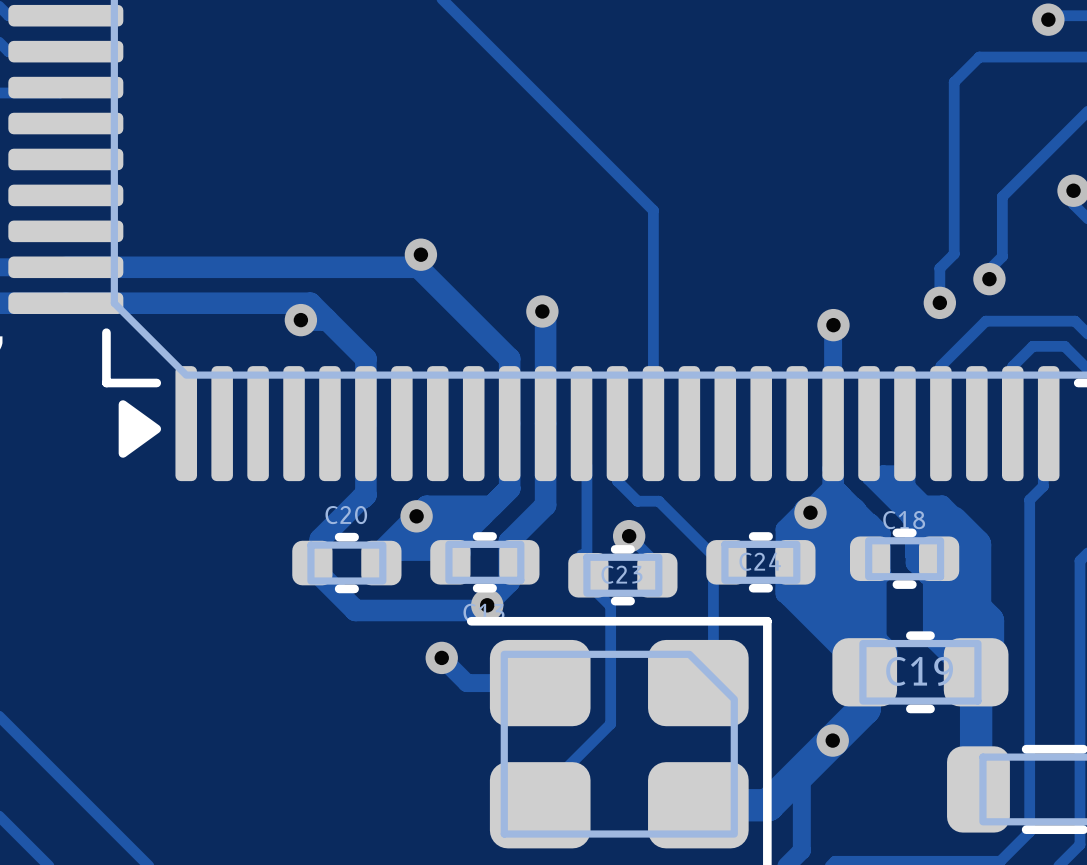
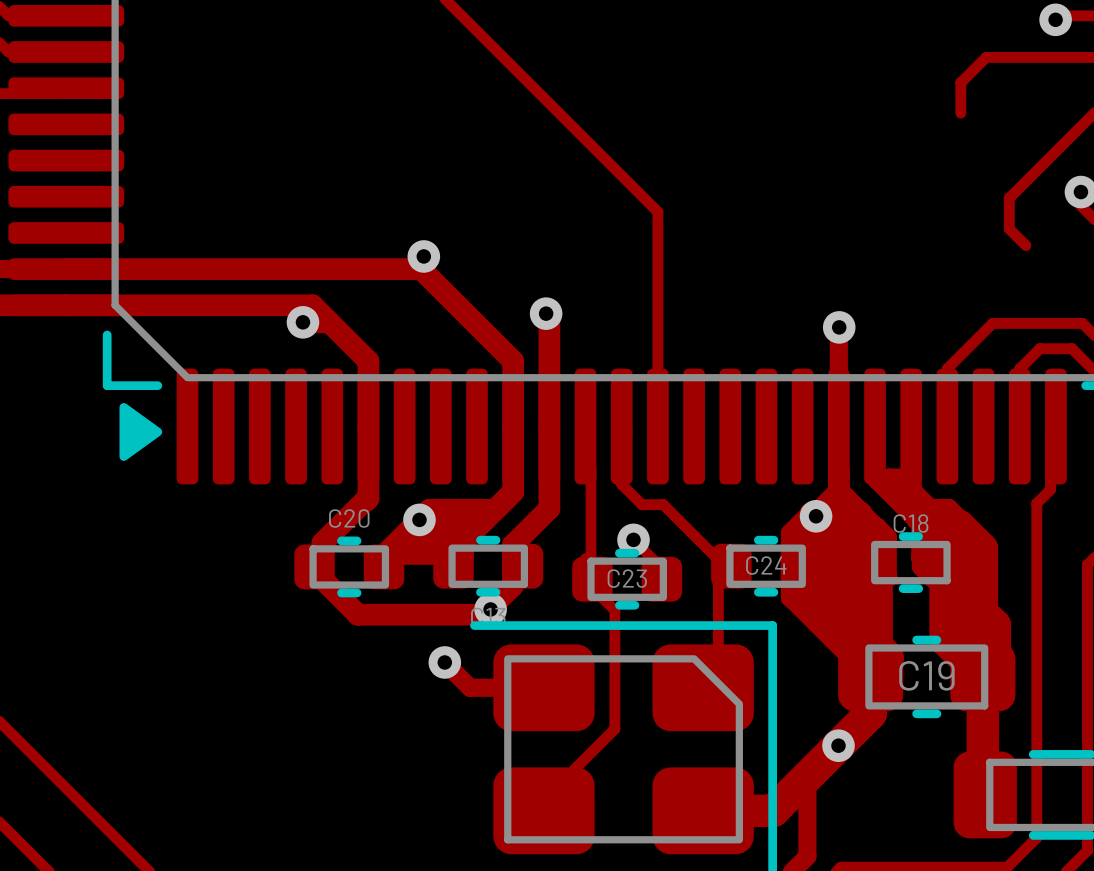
track: (954, 112) (954, 253) (939, 268) (939, 302) -> none
track: (1002, 227) (1002, 256) (989, 269) (989, 279) -> (1009, 228) (1025, 245)
via: (989, 279) -> none
via: (939, 302) -> none

